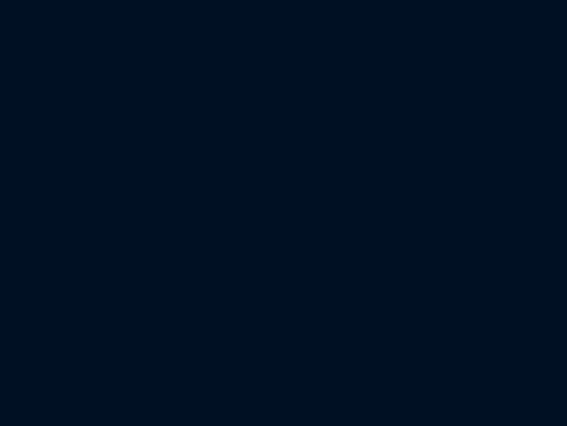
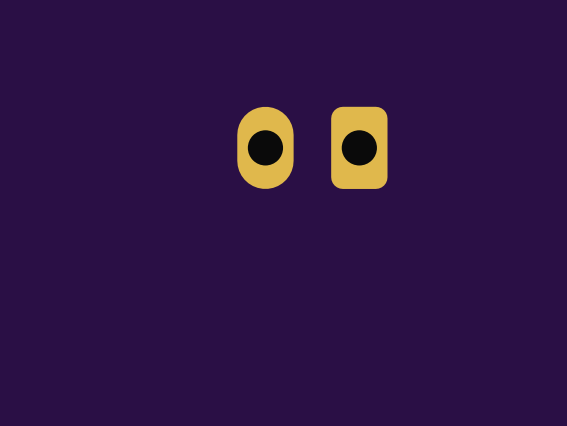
part: none -> (312, 147)

